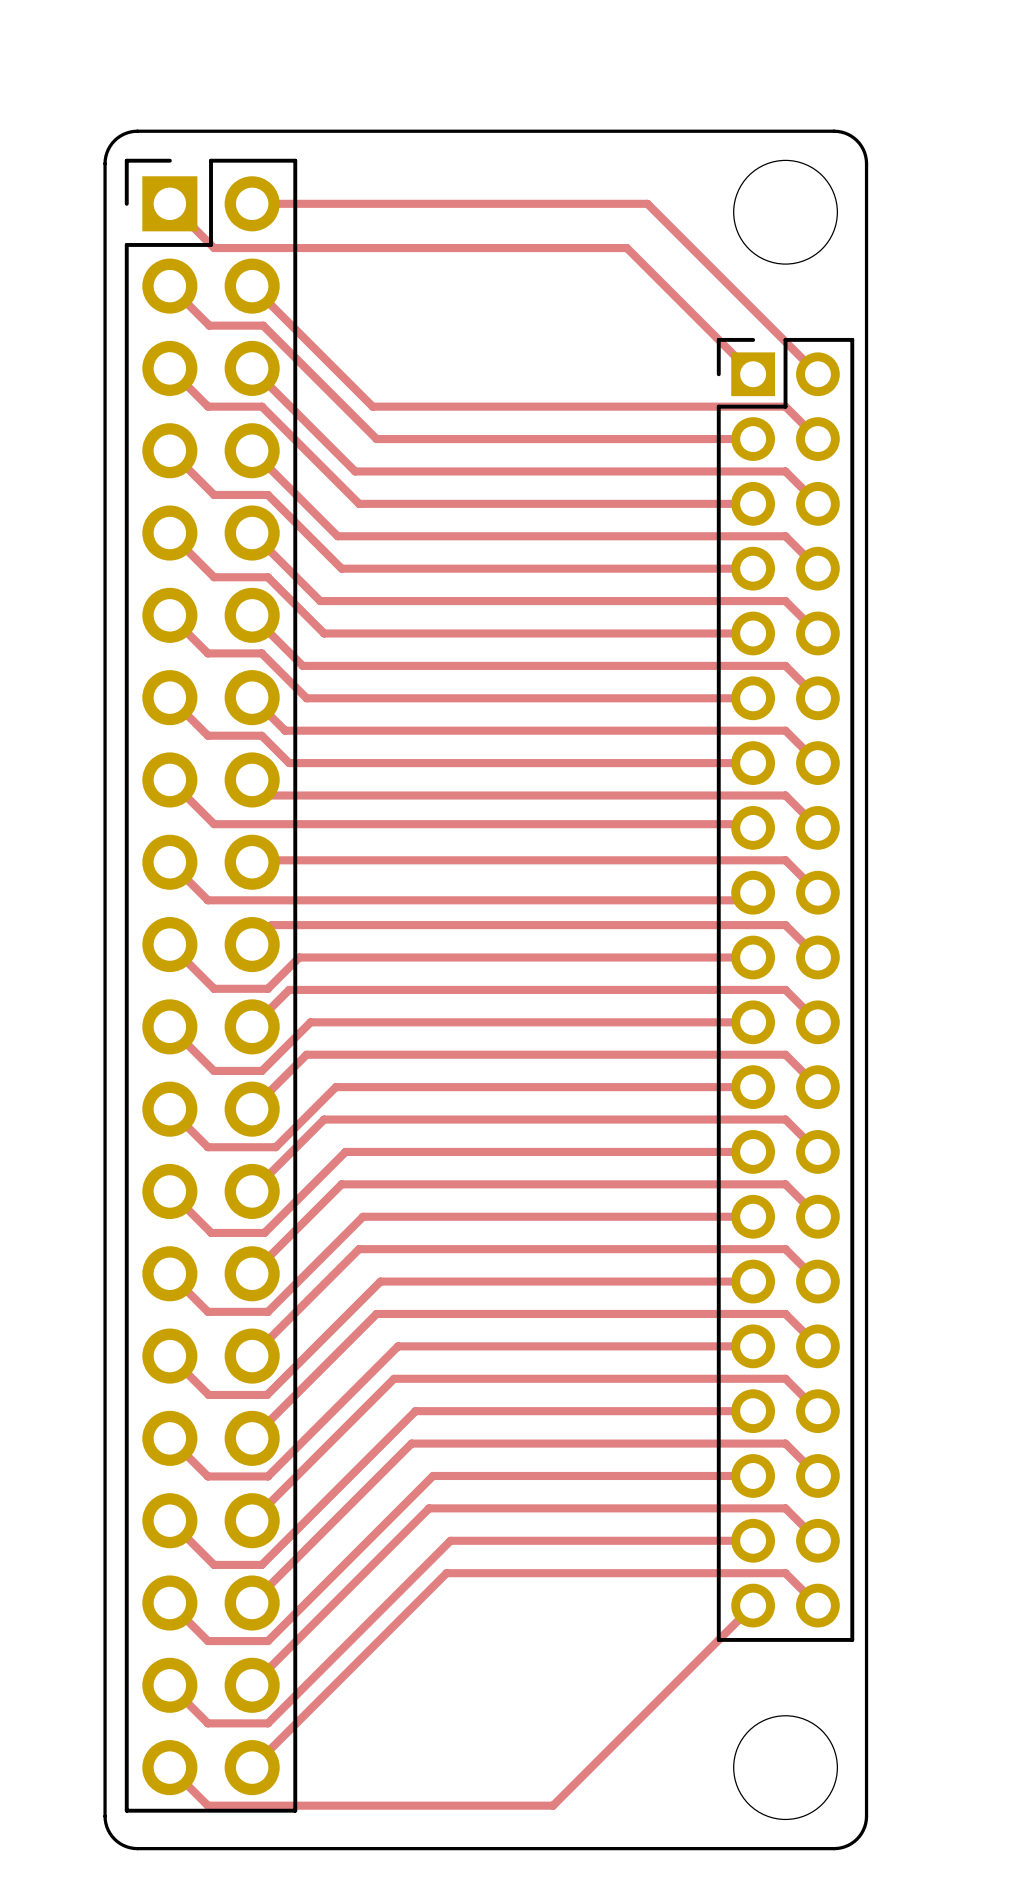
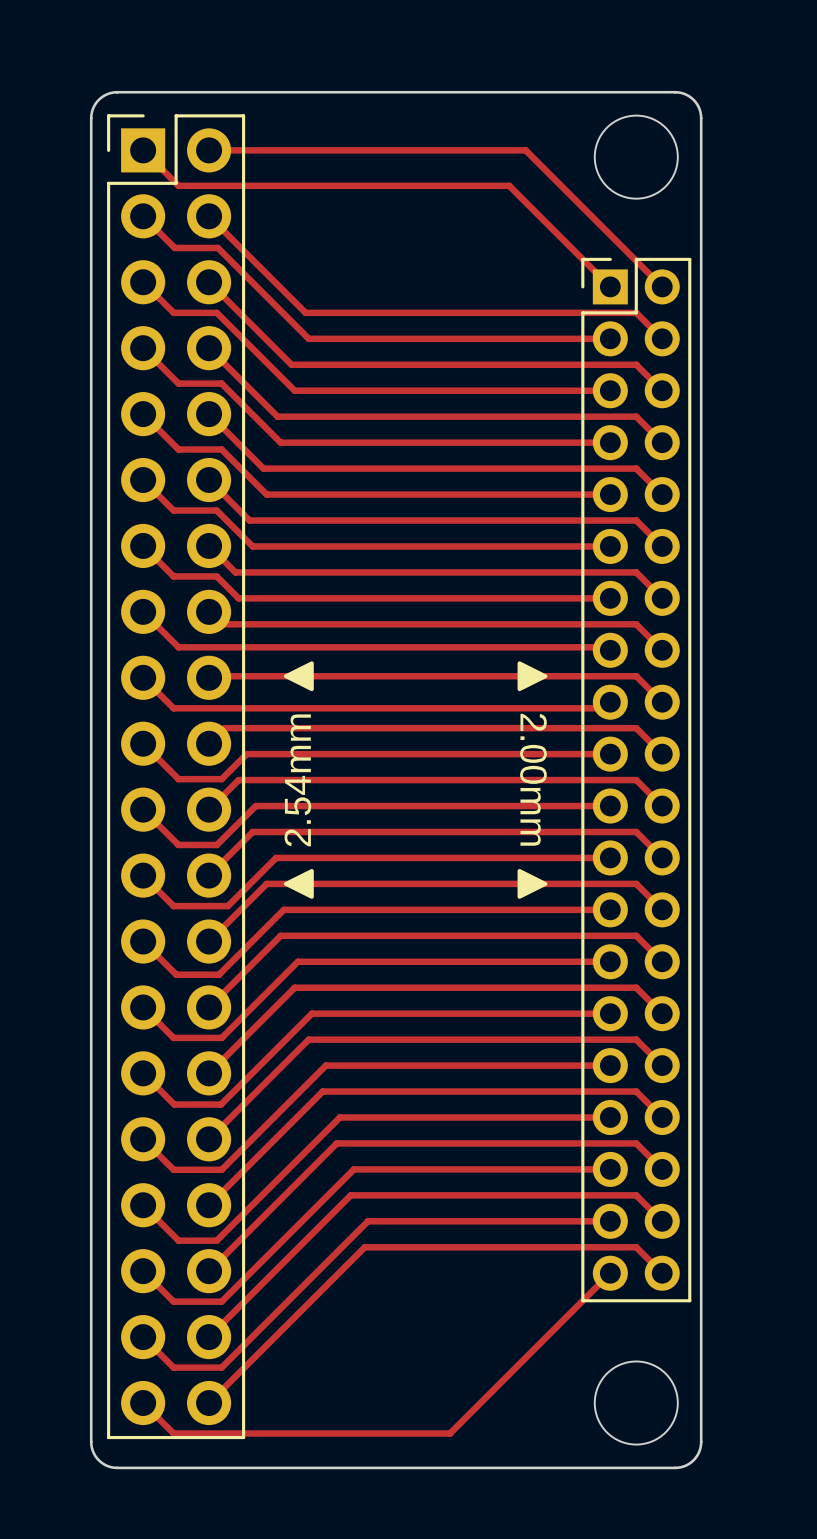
drawing: none -> [283, 661, 314, 692]
drawing: none -> [517, 661, 548, 692]
text: none -> 2.00mm (533, 779)
text: none -> 2.54mm (297, 780)
drawing: none -> [283, 868, 314, 899]
drawing: none -> [517, 868, 548, 899]

